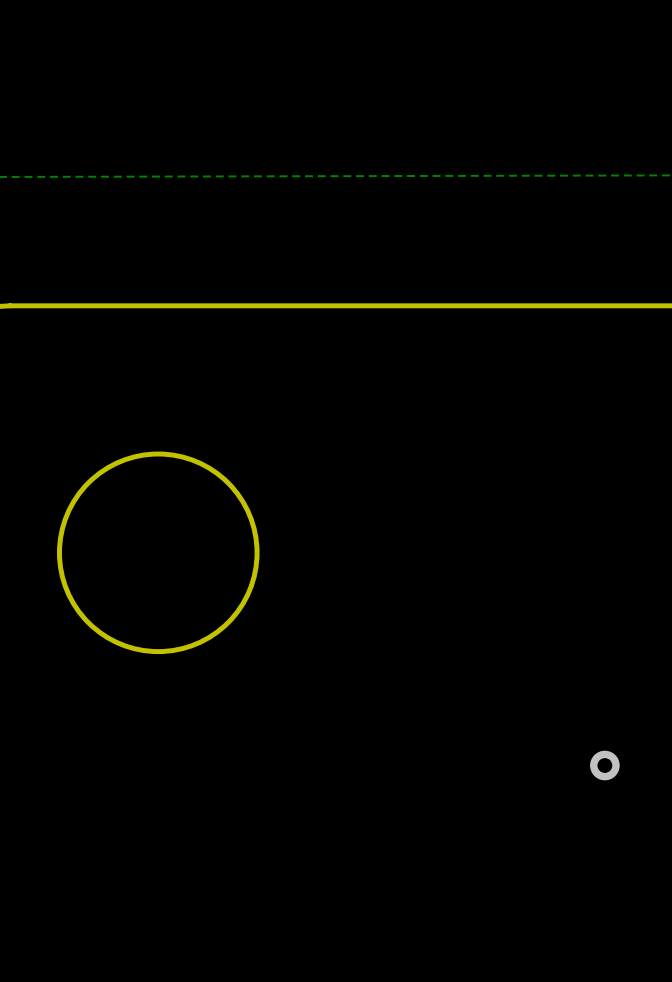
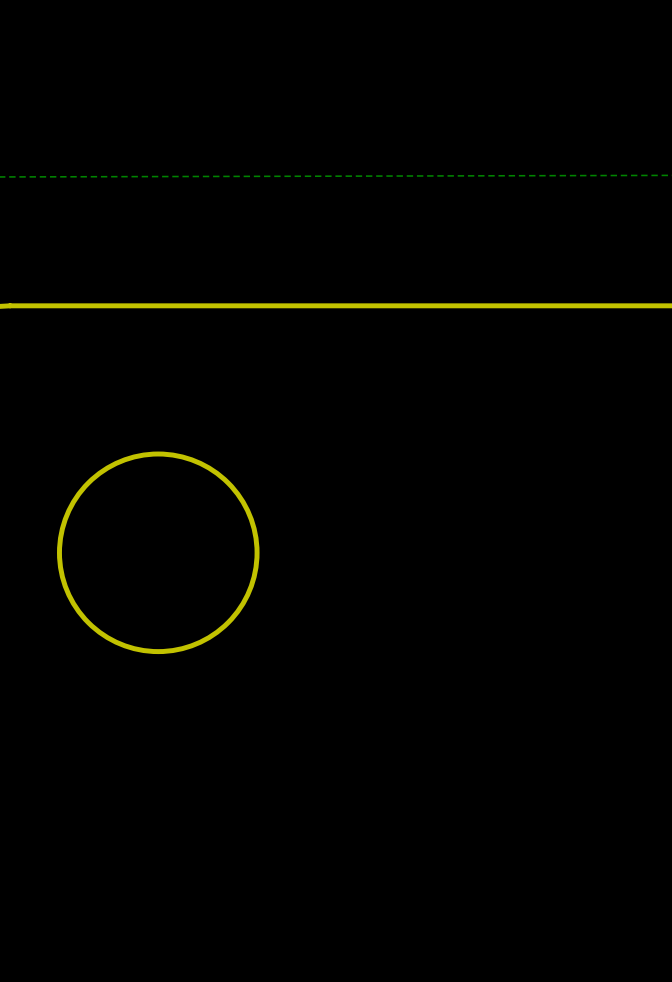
via: (604, 765) -> none

